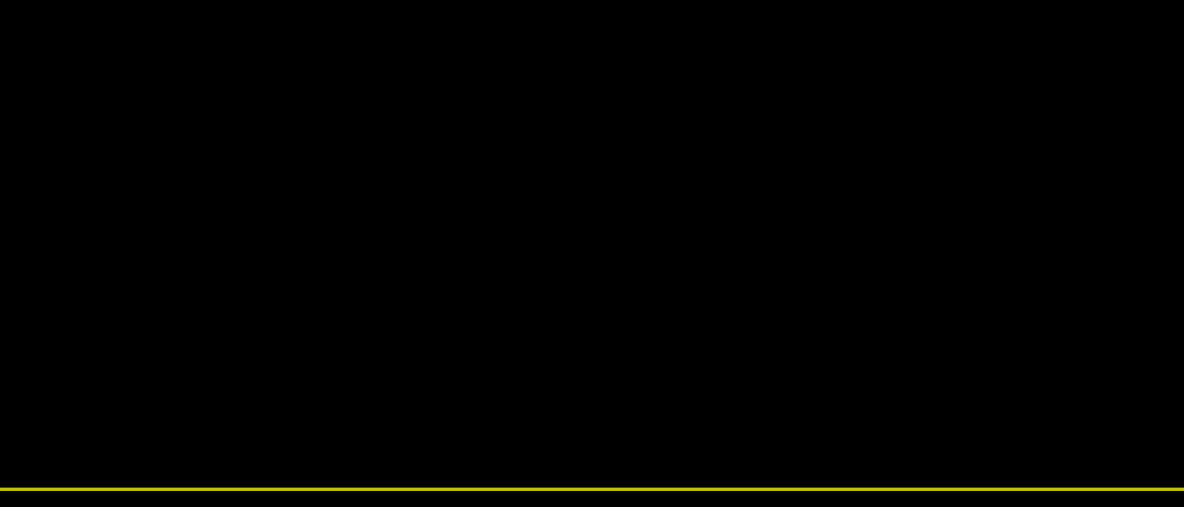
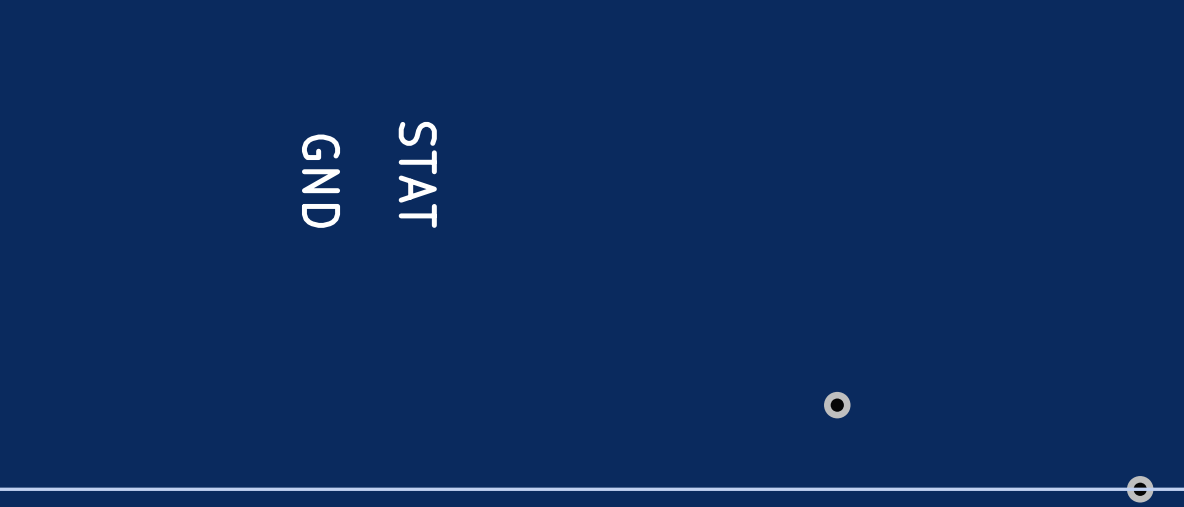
text: none -> STAT (417, 174)
text: none -> GND (321, 181)
via: none -> (837, 405)
via: none -> (1140, 489)

